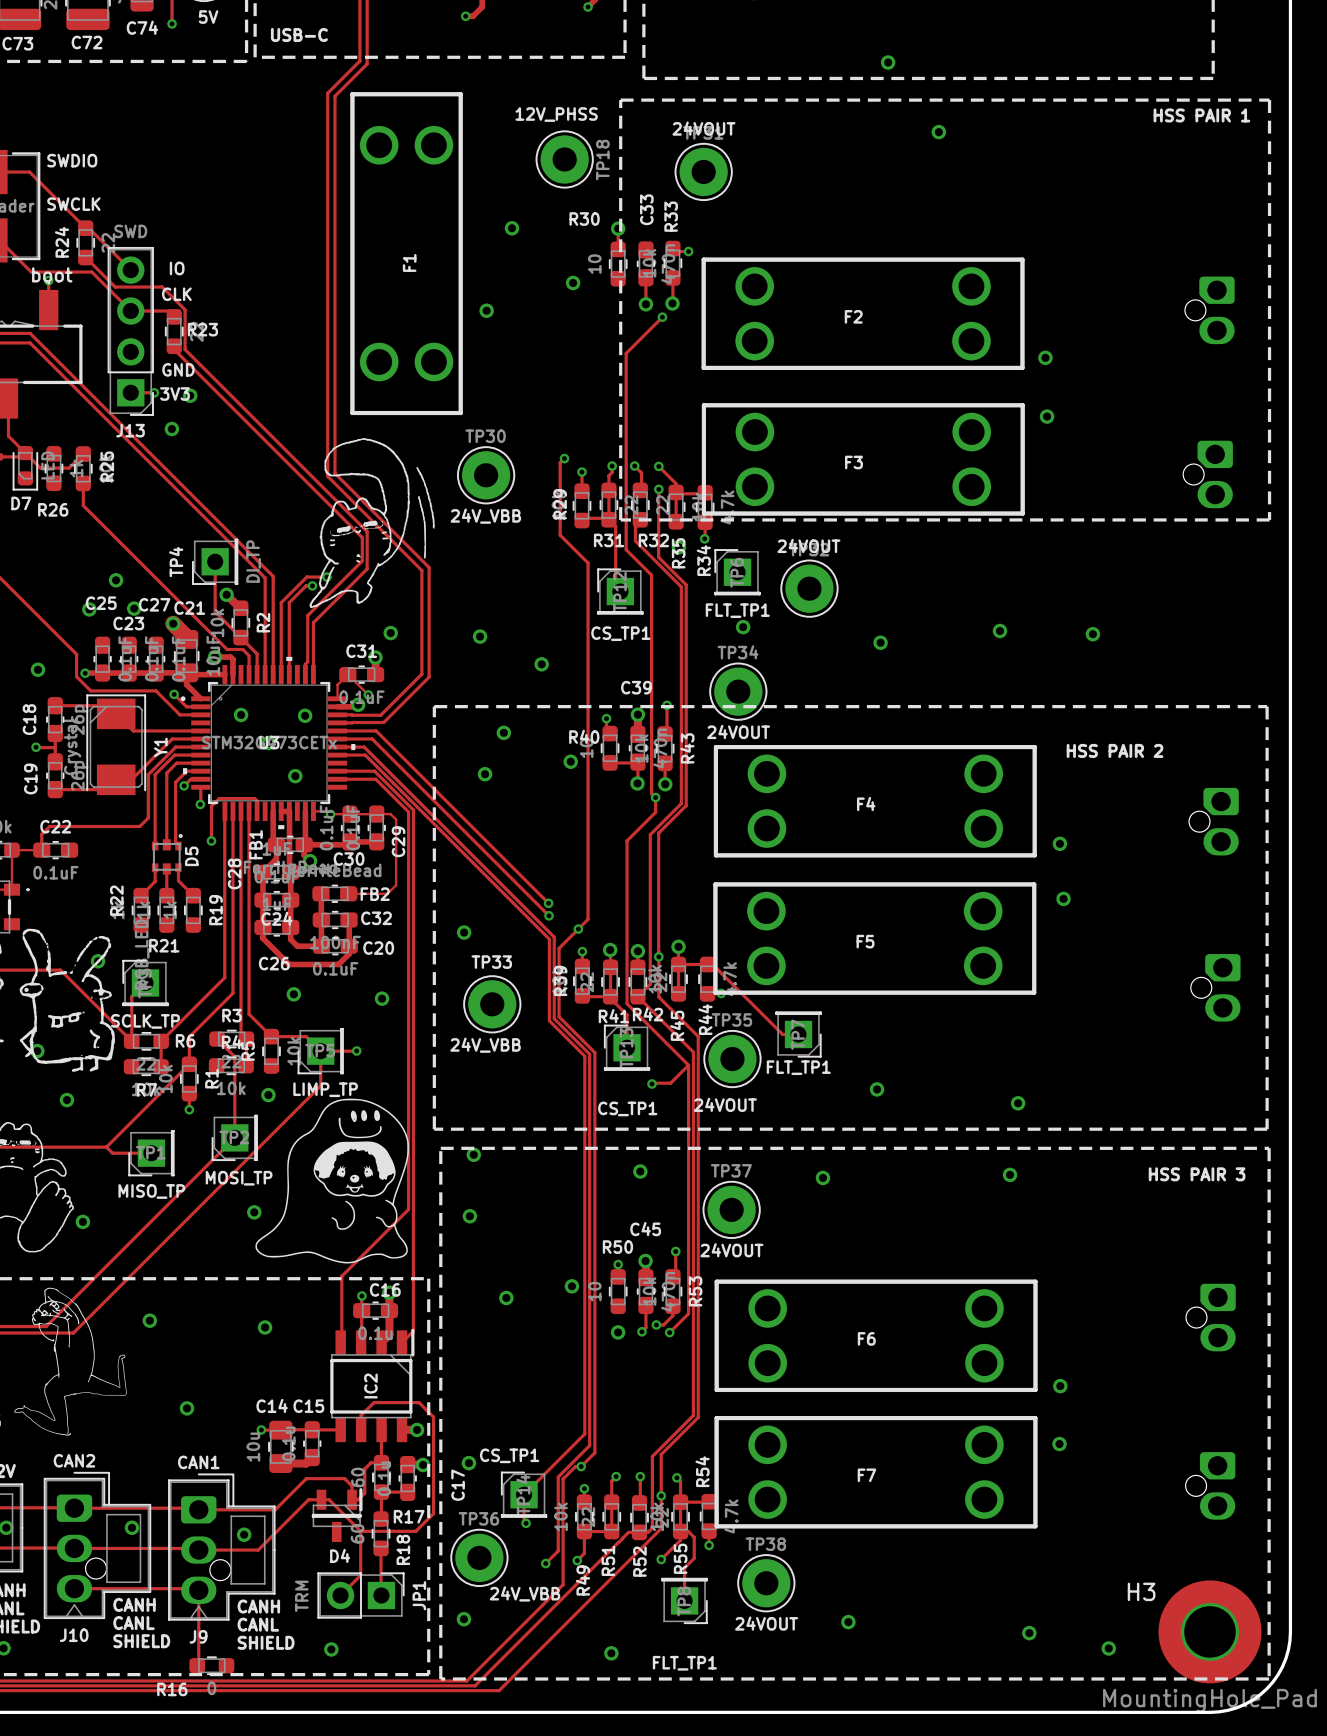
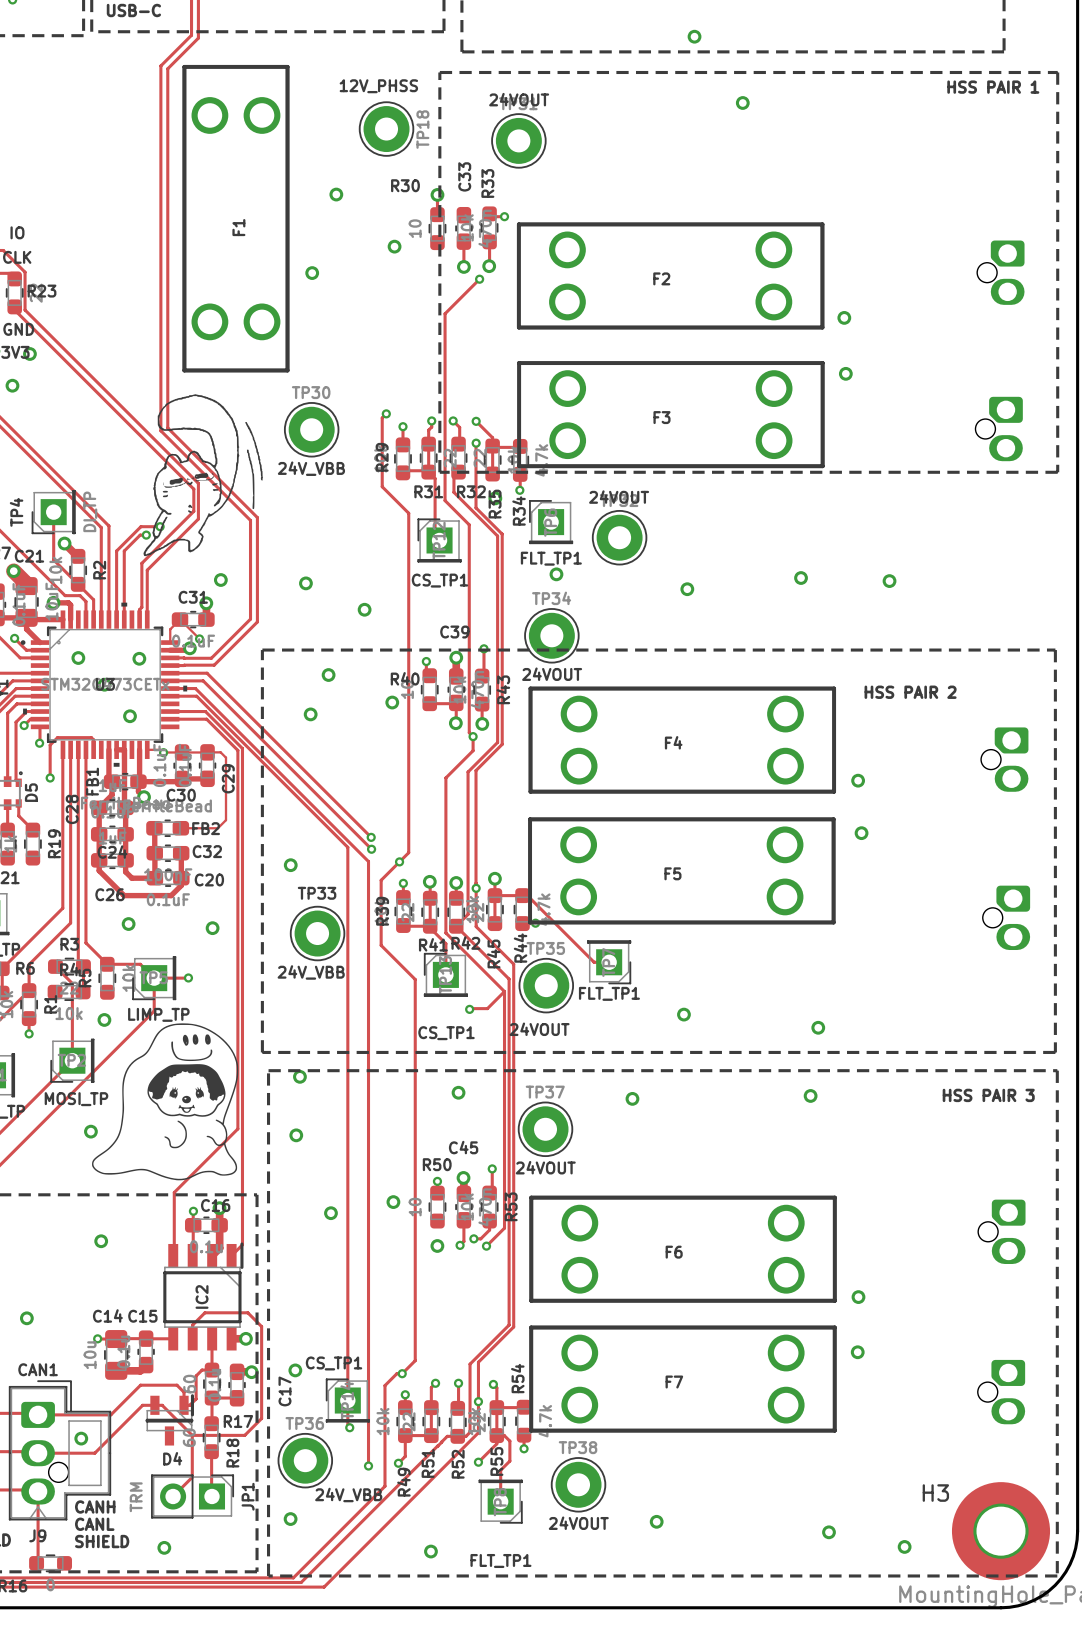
track: (524, 913) (549, 939) (549, 1020) (584, 1056) (584, 1433) (524, 1494) -> (347, 847) (347, 1400)
track: (545, 928) (554, 937) (554, 1018) (589, 1054) (589, 1445) (558, 1477) (558, 1551) (545, 1563) -> (368, 861) (368, 1466)

